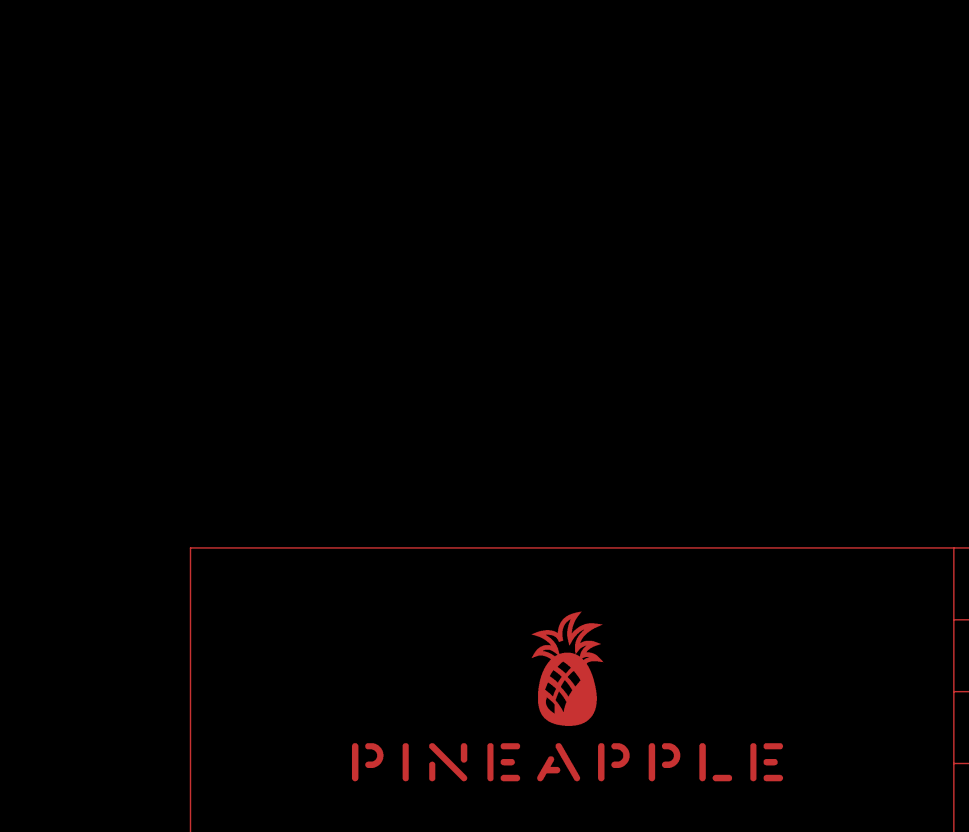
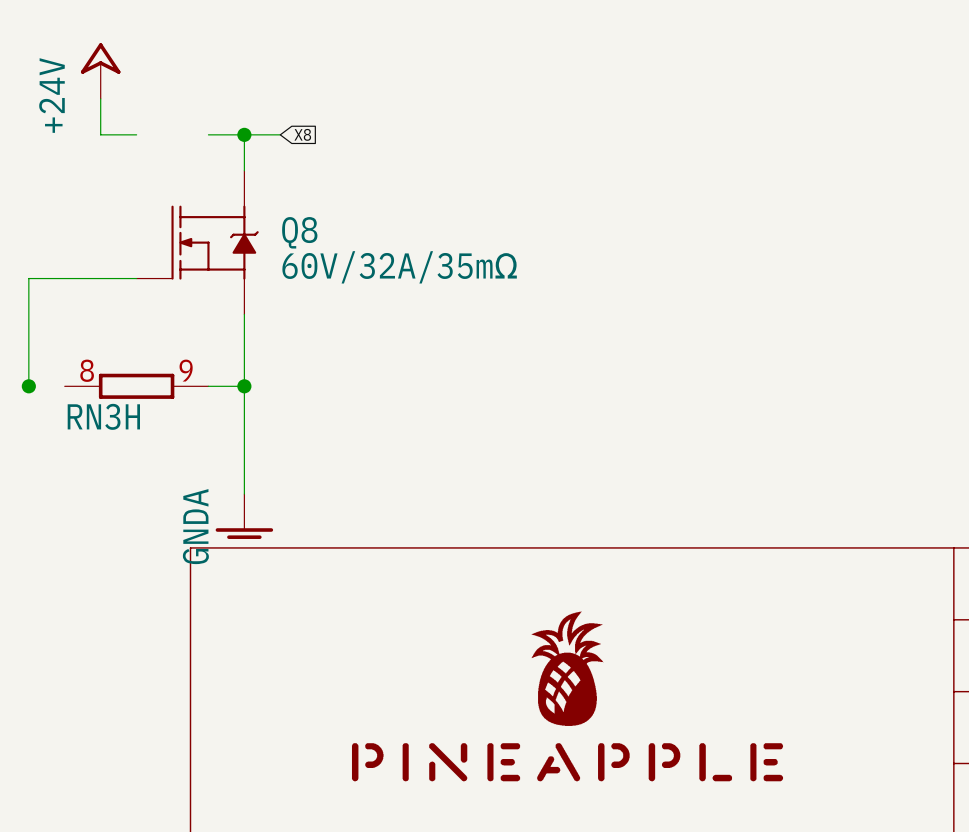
power symbol: none -> +24V (100, 71)
wire: none -> (100, 98) (100, 134) (136, 134)
wire: none -> (208, 134) (280, 134)
wire: none -> (244, 134) (244, 170)
junction: none -> (244, 134)
global label: none -> X8 (302, 134)
Q8: none -> 60V/32A/35mΩ (197, 242)
wire: none -> (136, 278) (28, 278) (28, 386)
wire: none -> (244, 314) (244, 494)
junction: none -> (28, 386)
RN3H: none -> (136, 386)
wire: none -> (208, 386) (244, 386)
junction: none -> (244, 386)
power symbol: none -> GNDA (244, 516)

